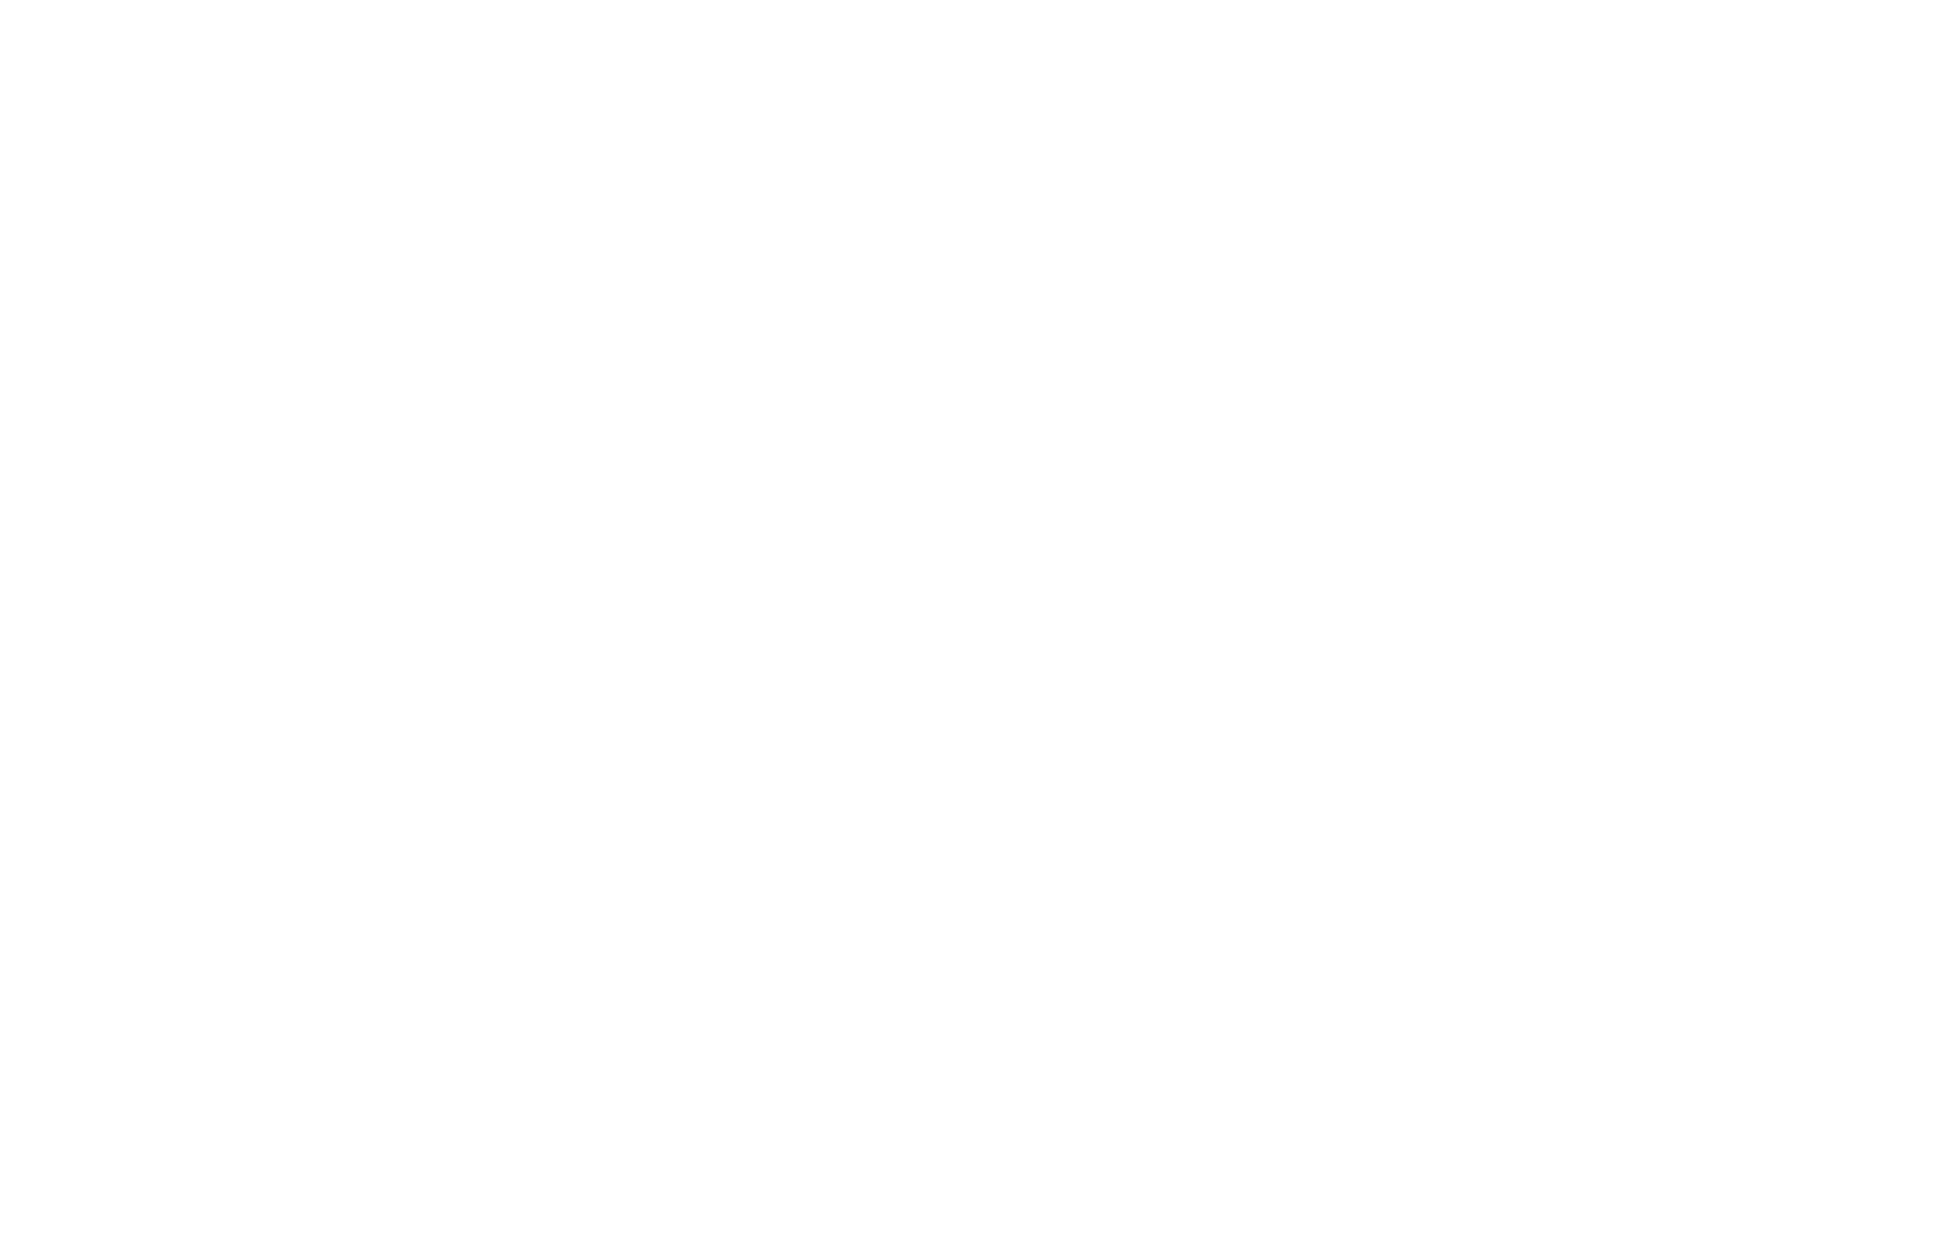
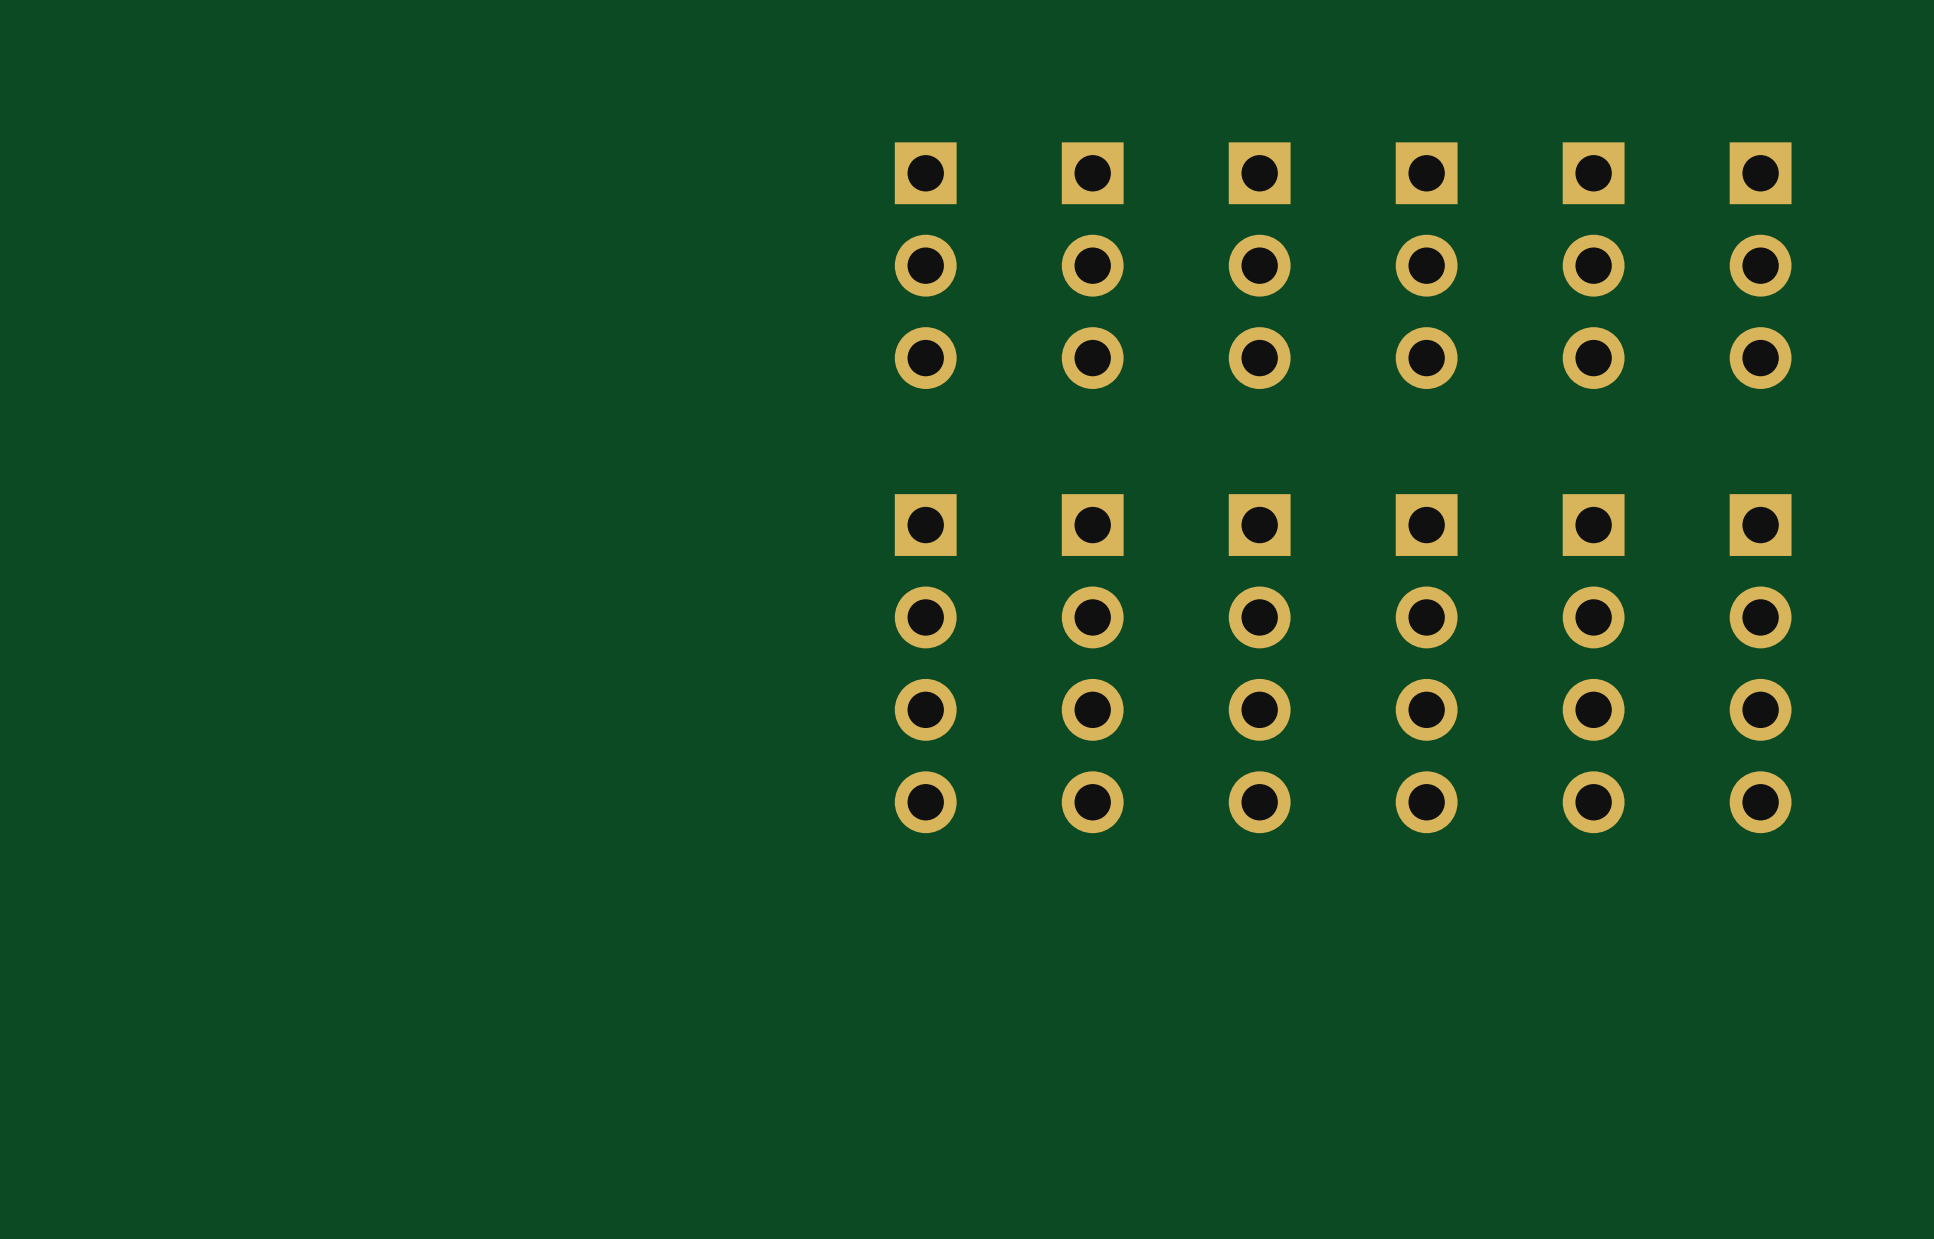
part: none -> (925, 265)
part: none -> (1092, 265)
part: none -> (1259, 265)
part: none -> (1426, 265)
part: none -> (1593, 265)
part: none -> (1760, 265)
part: none -> (925, 663)
part: none -> (1092, 663)
part: none -> (1259, 663)
part: none -> (1426, 663)
part: none -> (1593, 663)
part: none -> (1760, 663)

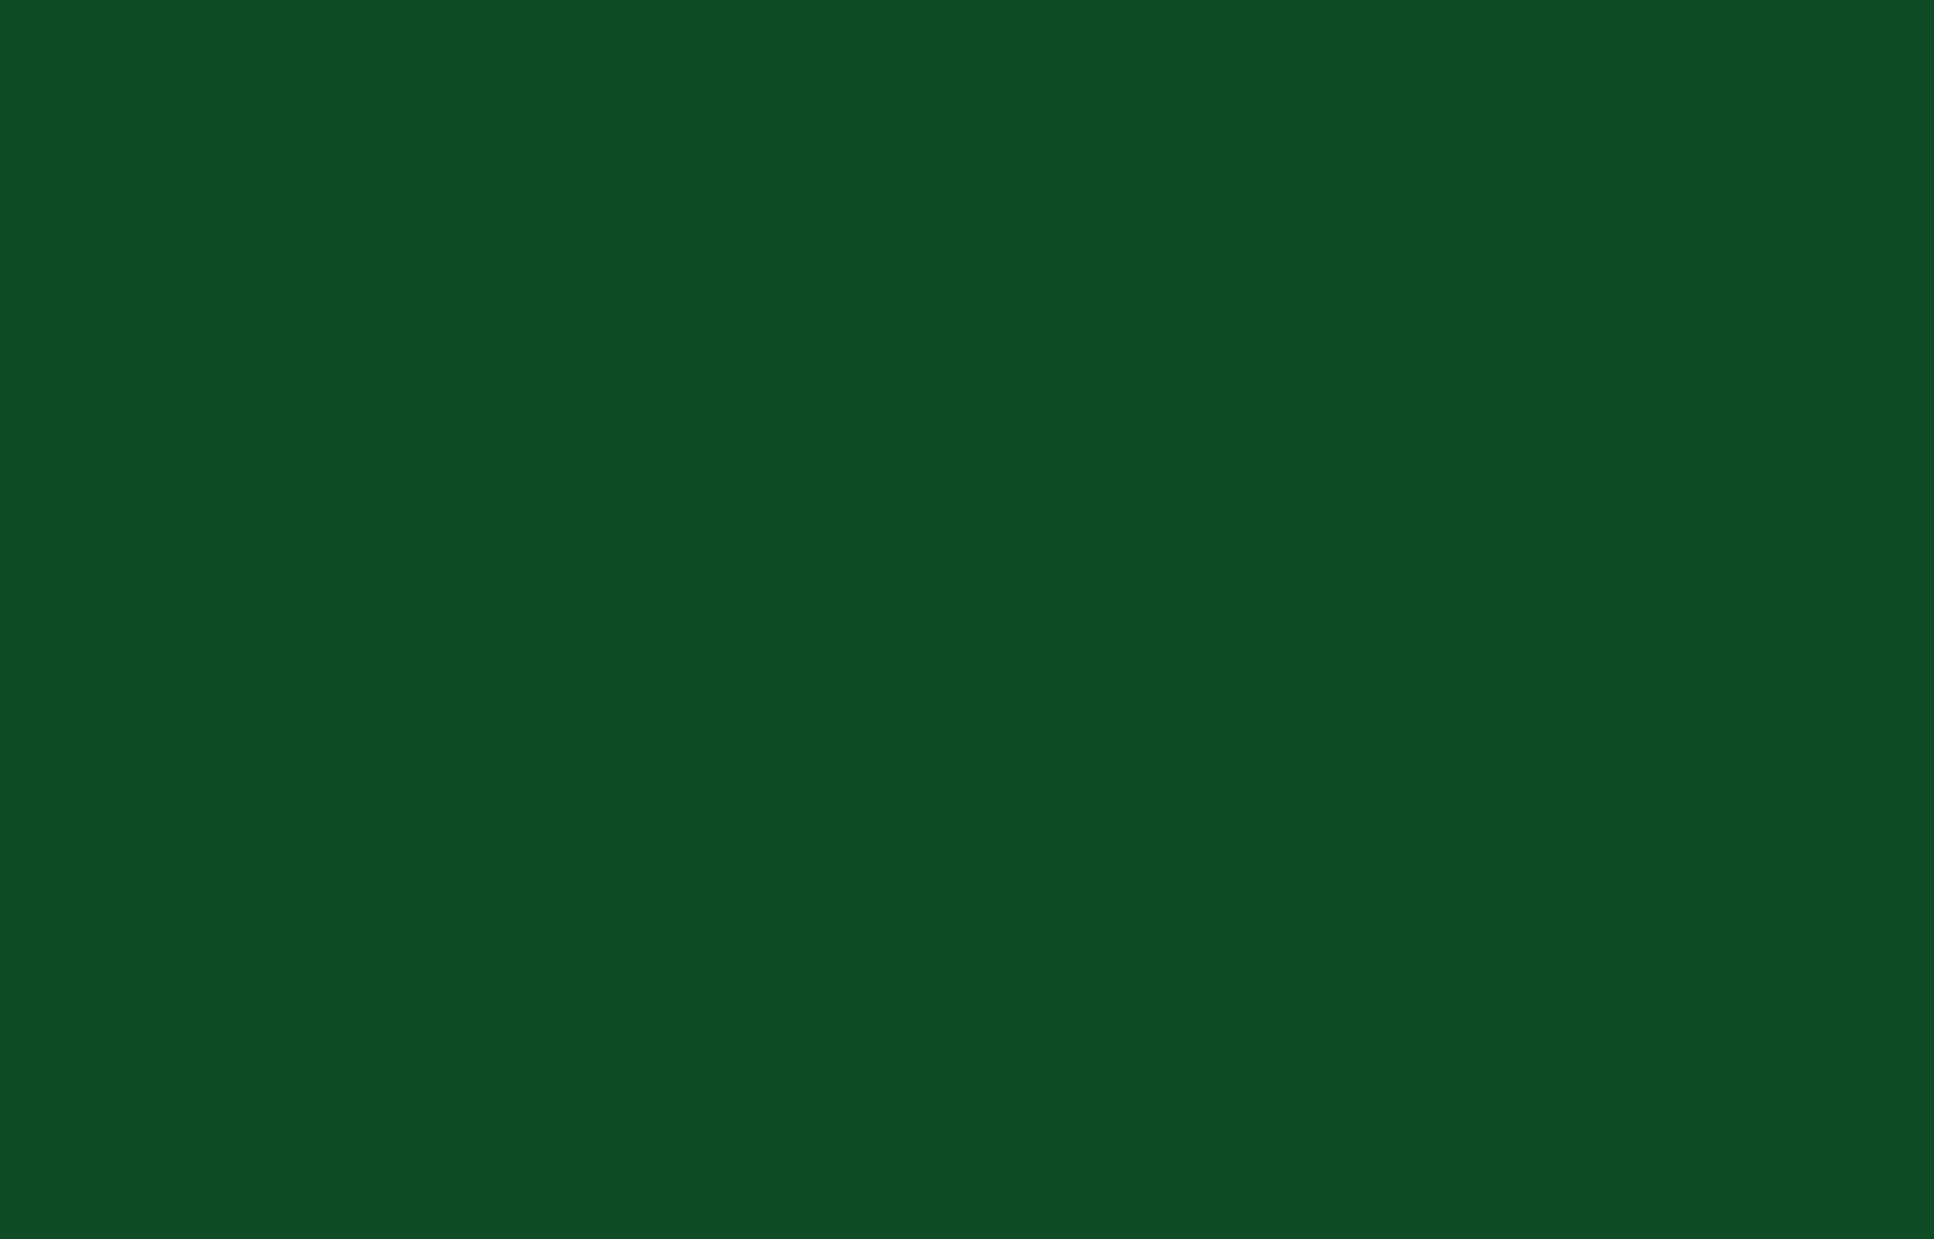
part: (925, 265) -> none
part: (1092, 265) -> none
part: (1259, 265) -> none
part: (1426, 265) -> none
part: (1593, 265) -> none
part: (1760, 265) -> none
part: (925, 663) -> none
part: (1092, 663) -> none
part: (1259, 663) -> none
part: (1426, 663) -> none
part: (1593, 663) -> none
part: (1760, 663) -> none

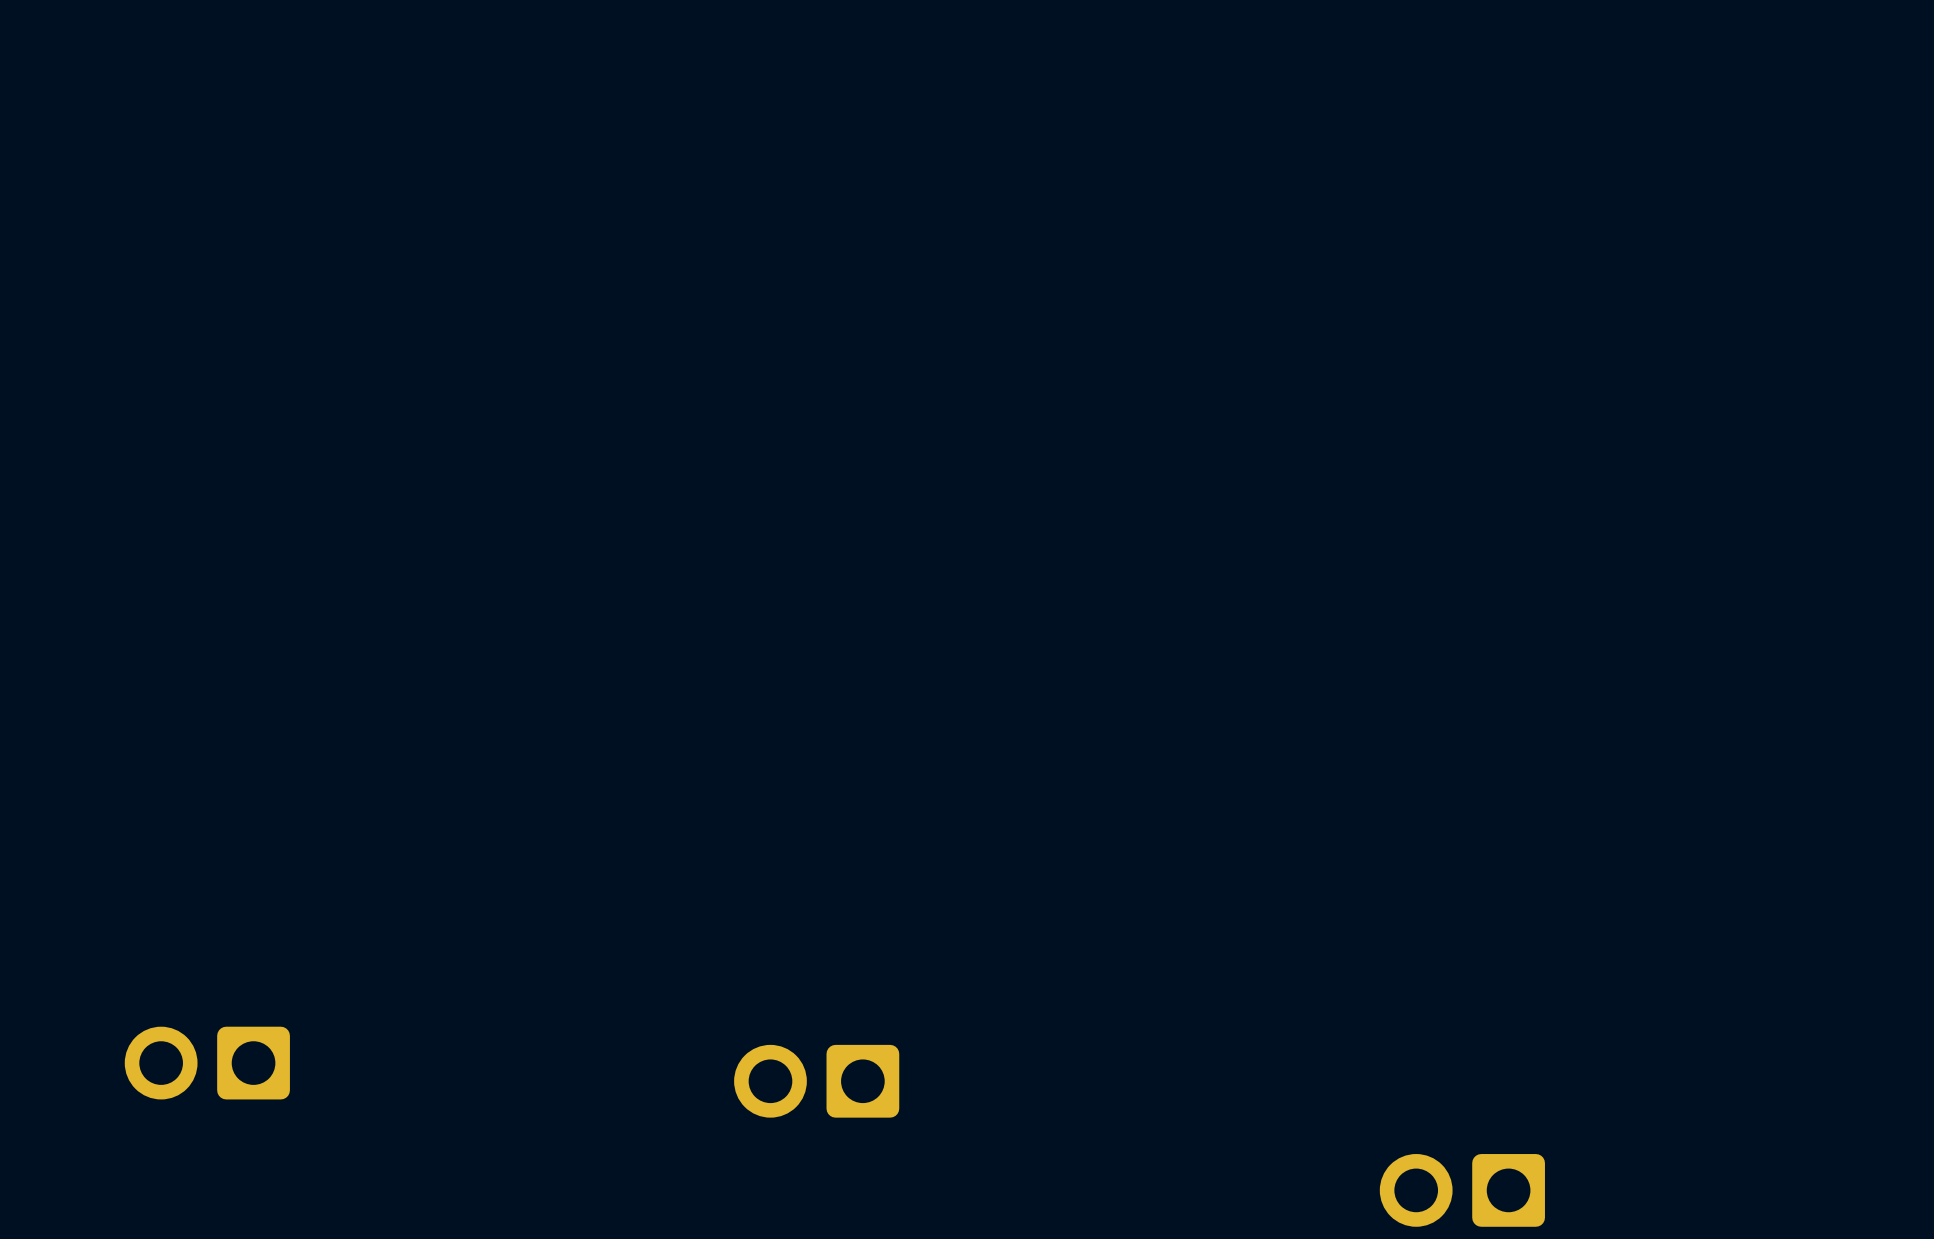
part: none -> (207, 1063)
part: none -> (816, 1081)
part: none -> (1462, 1190)

